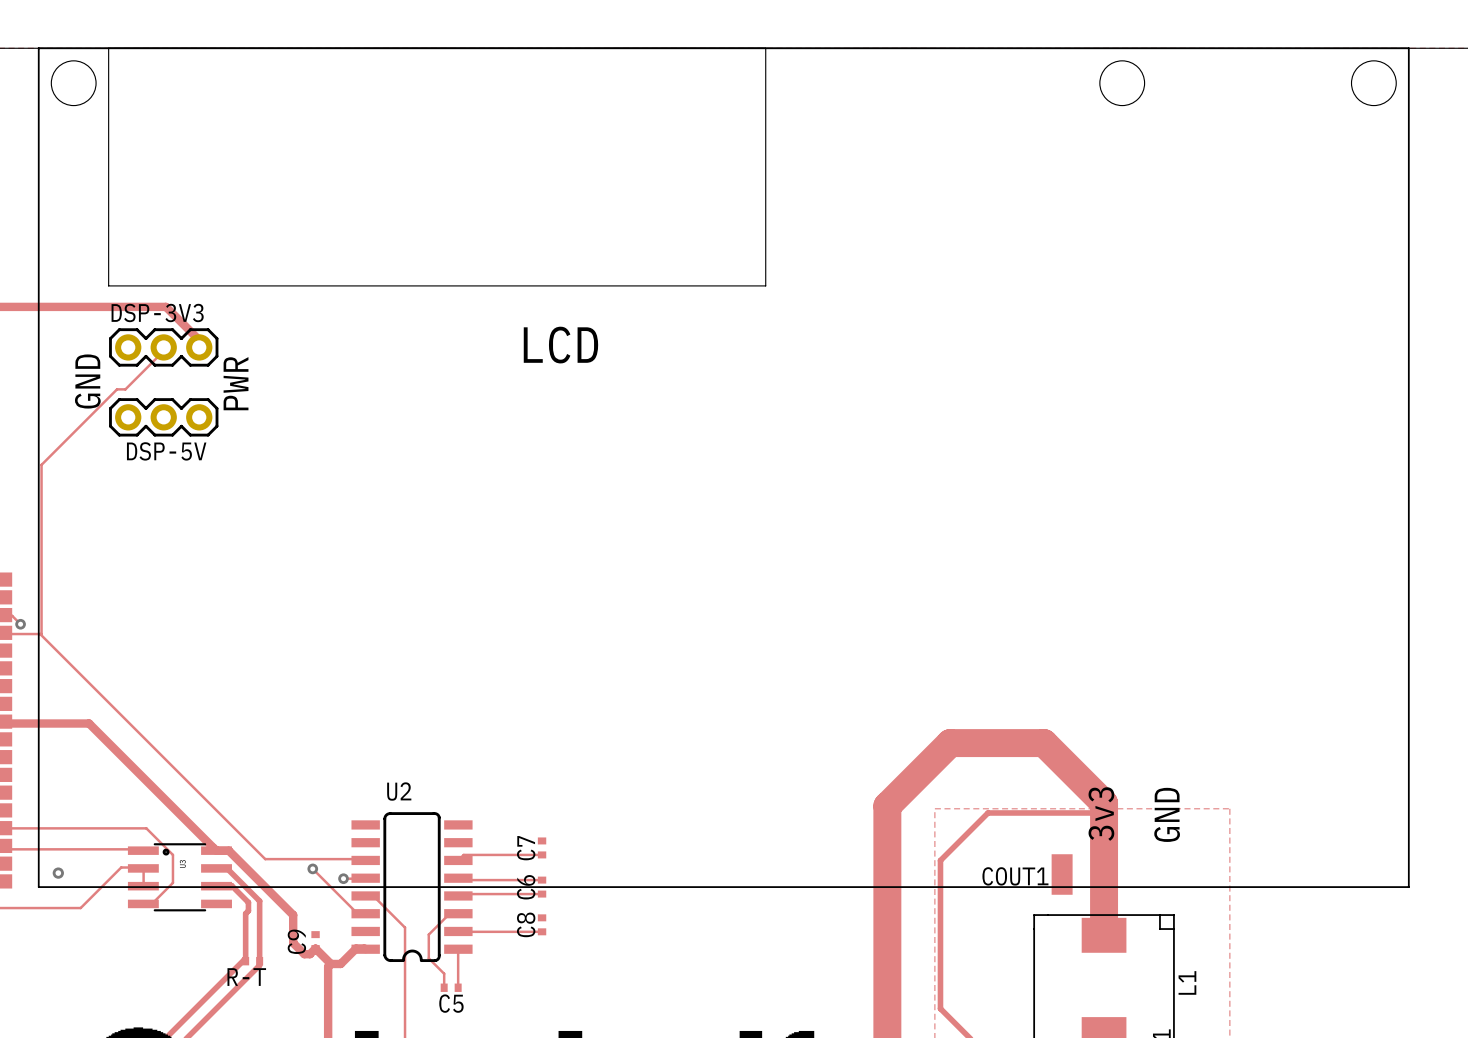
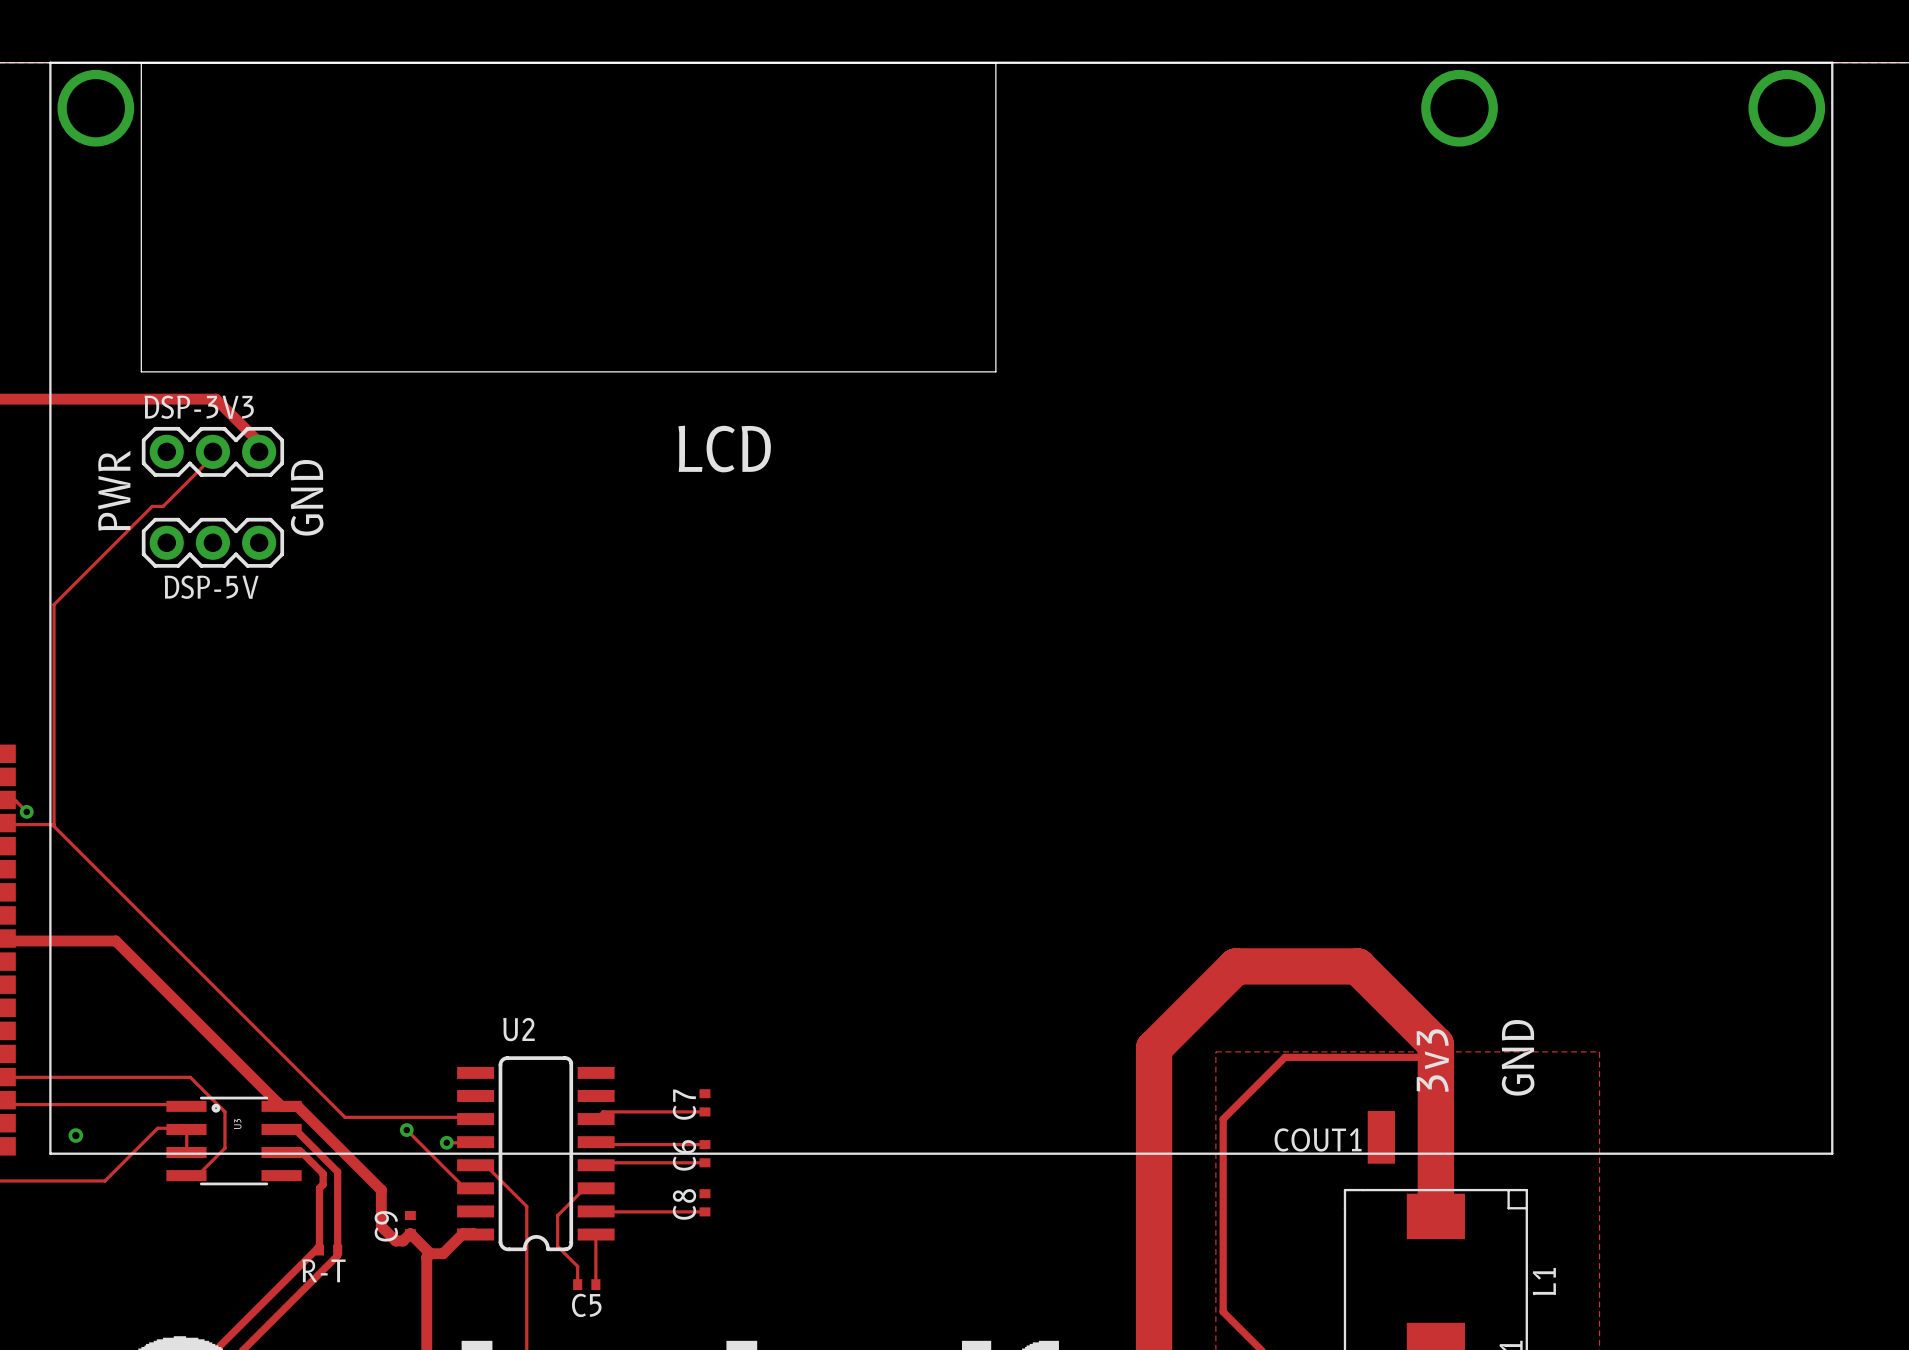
LCD footprint: [37, 47, 1410, 888] -> [49, 61, 1834, 1155]
text: GND (87, 381) -> PWR (114, 490)
text: PWR (236, 383) -> GND (307, 497)

